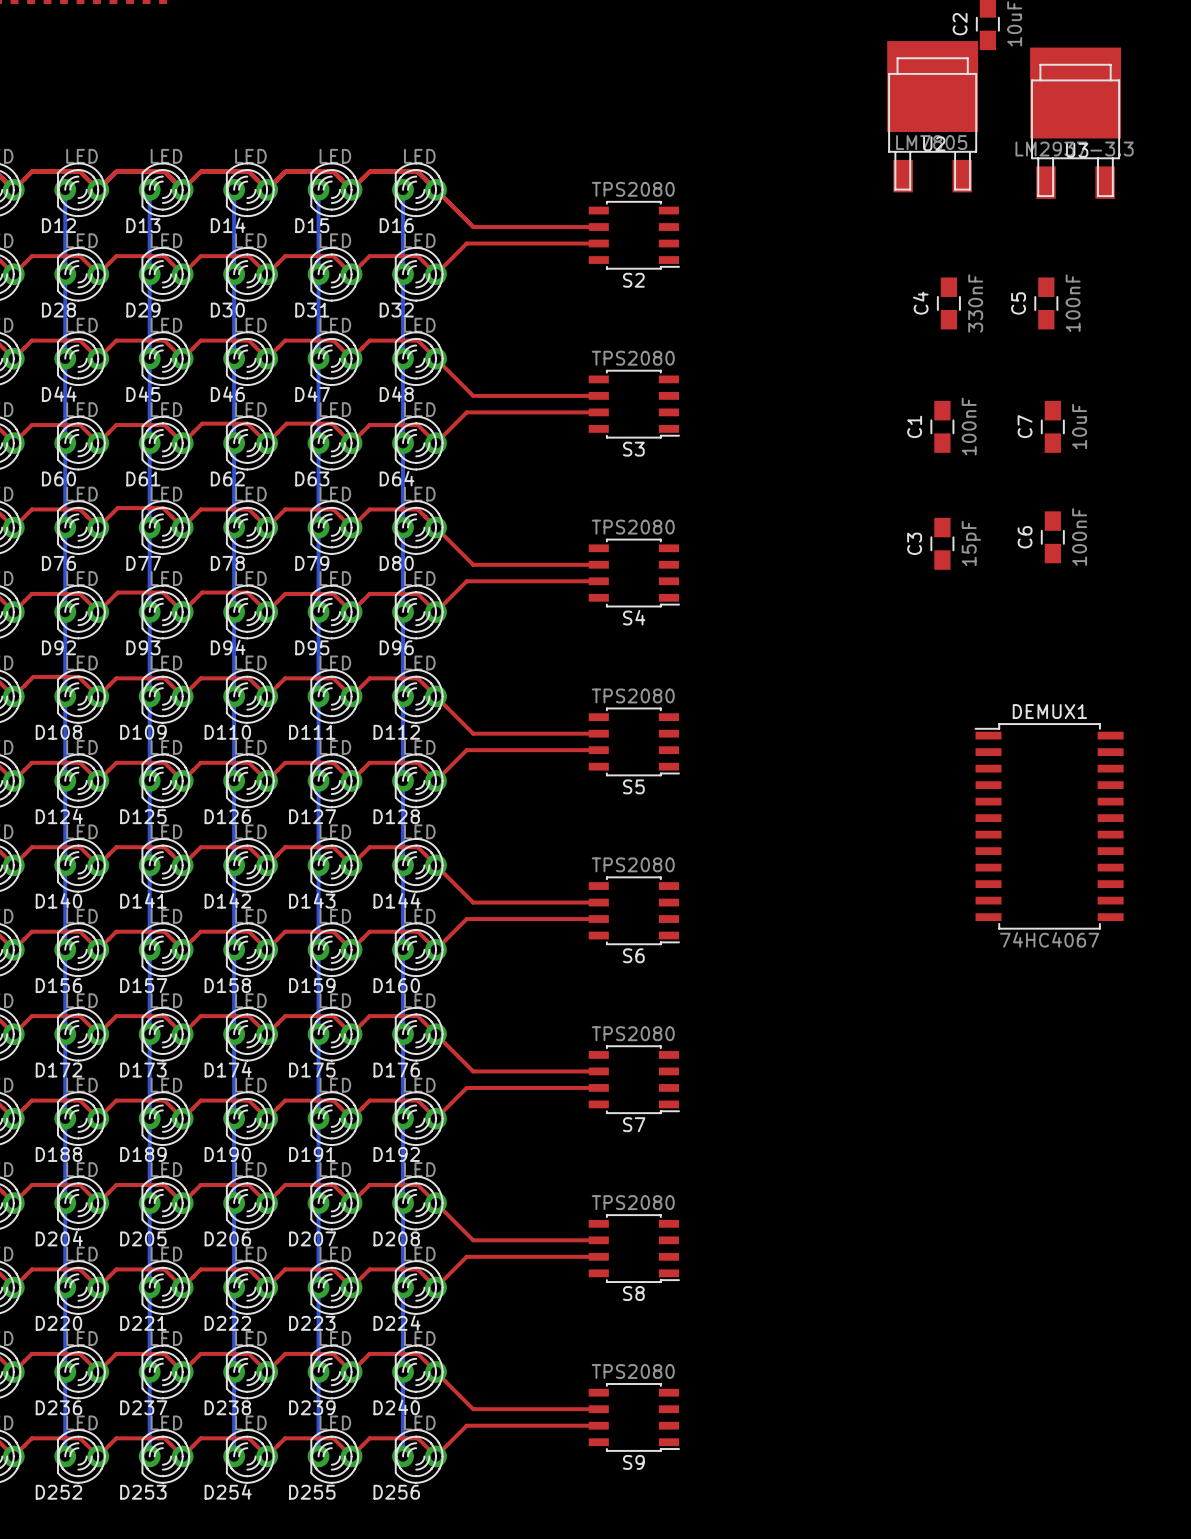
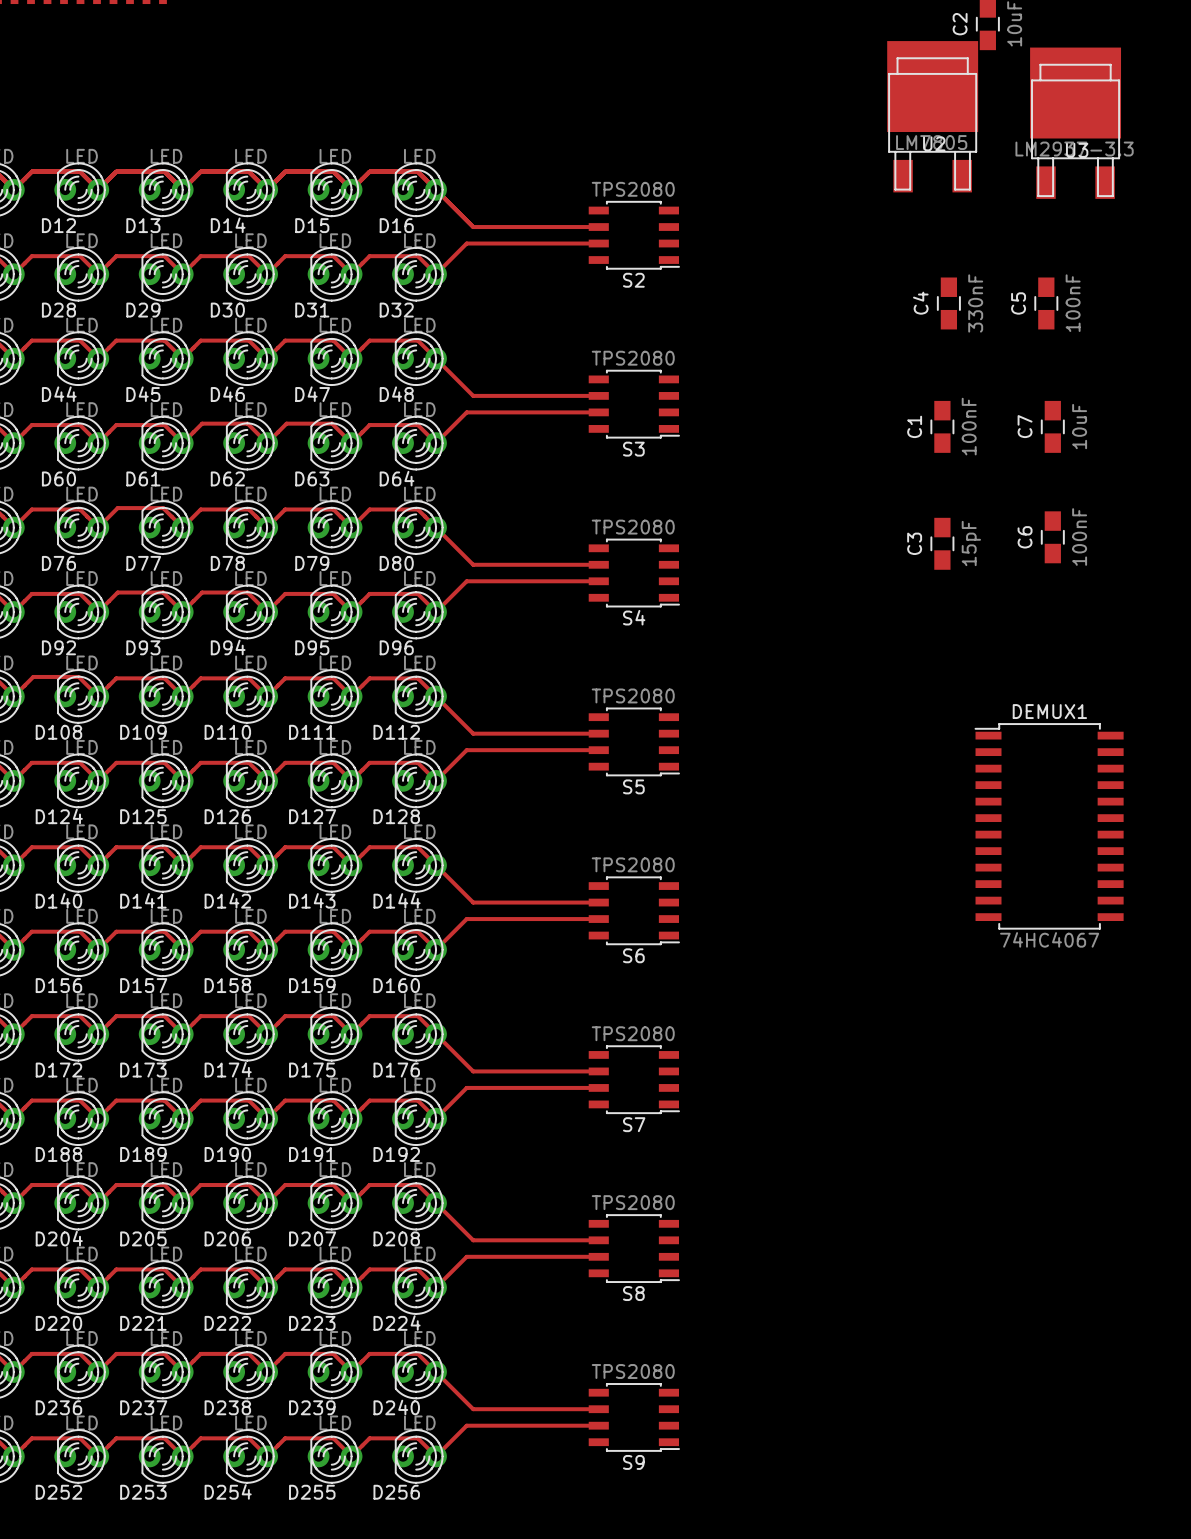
bottom track: (65, 189) (65, 1456) -> none
bottom track: (149, 189) (149, 1456) -> none
bottom track: (234, 189) (234, 1456) -> none
bottom track: (318, 189) (318, 1456) -> none
bottom track: (403, 189) (403, 1456) -> none

